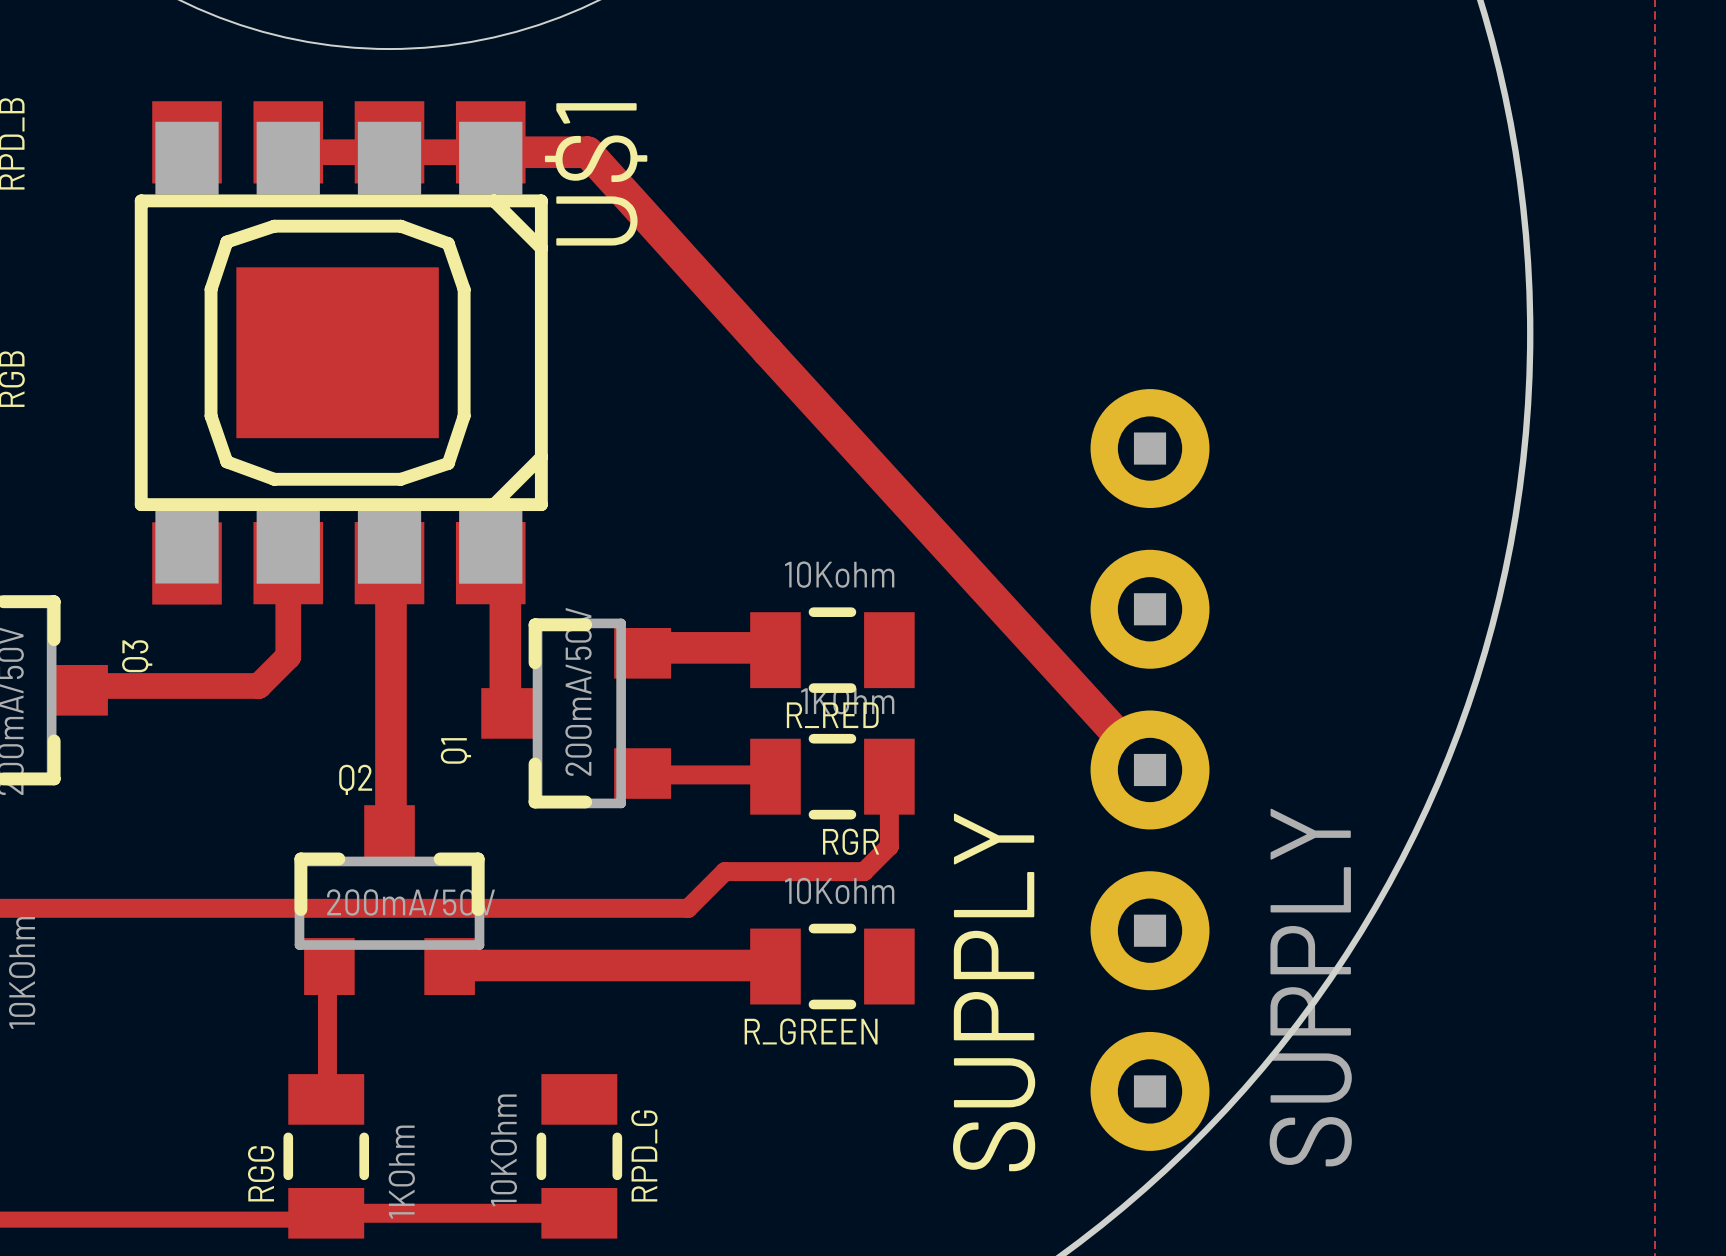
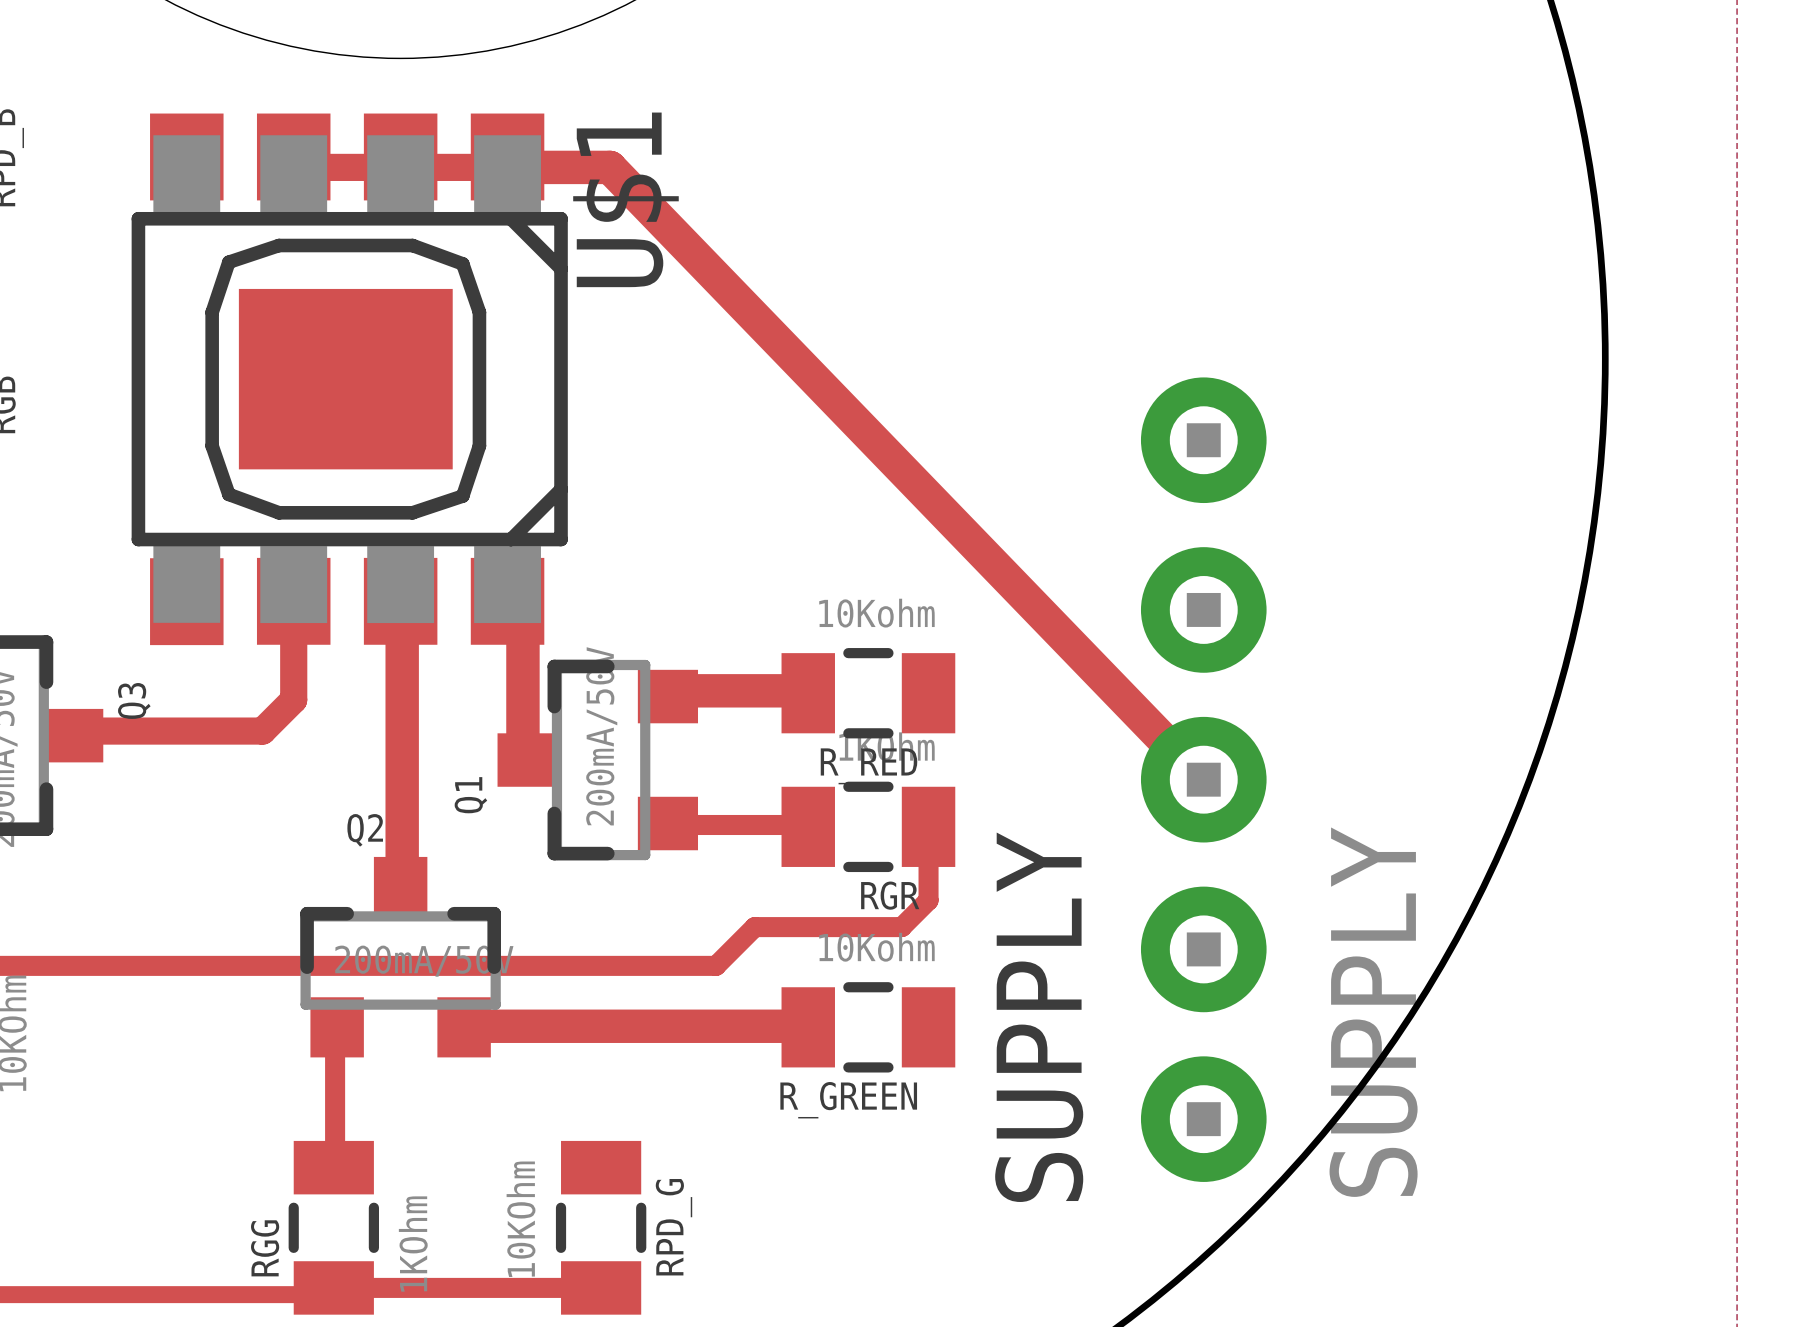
top track: (587, 152) (1150, 769) -> (609, 167) (1203, 779)
SUPPLY position: (1150, 769) -> (1203, 779)

